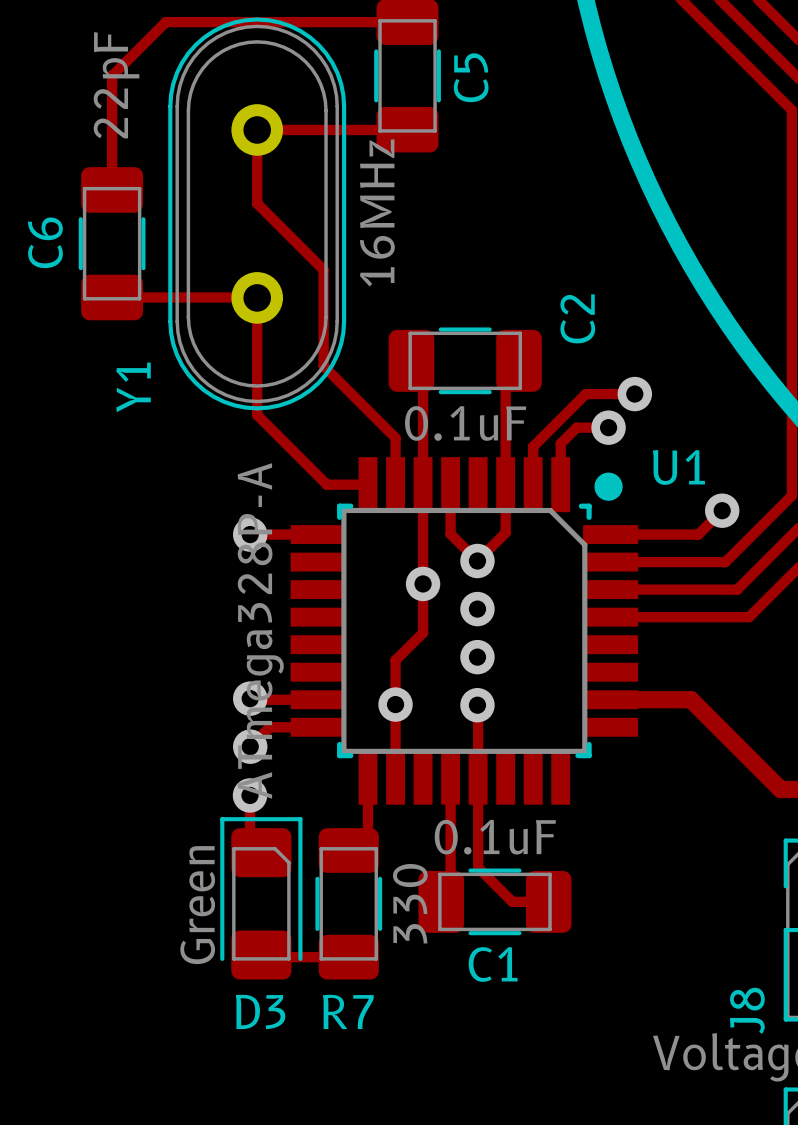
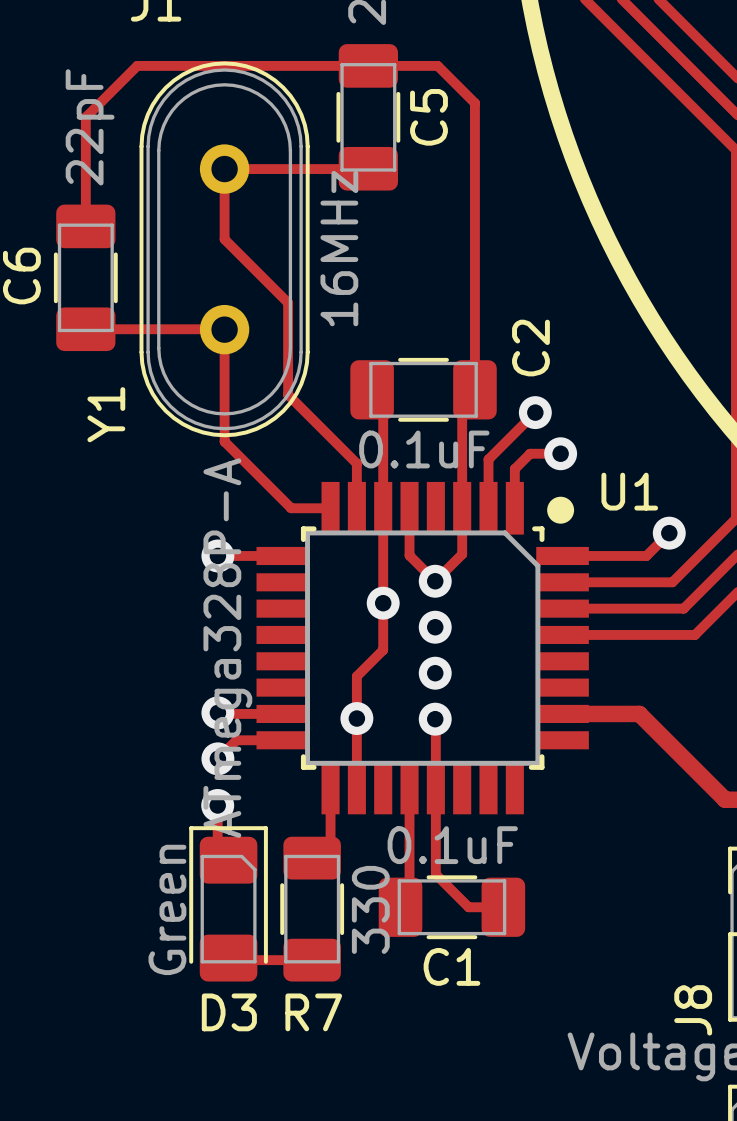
track: none -> (368, 65) (437, 65) (474, 103) (474, 389)
track: (634, 394) (585, 394) (533, 446) -> (535, 412) (488, 459) (488, 471)
via position: (634, 394) -> (535, 412)

